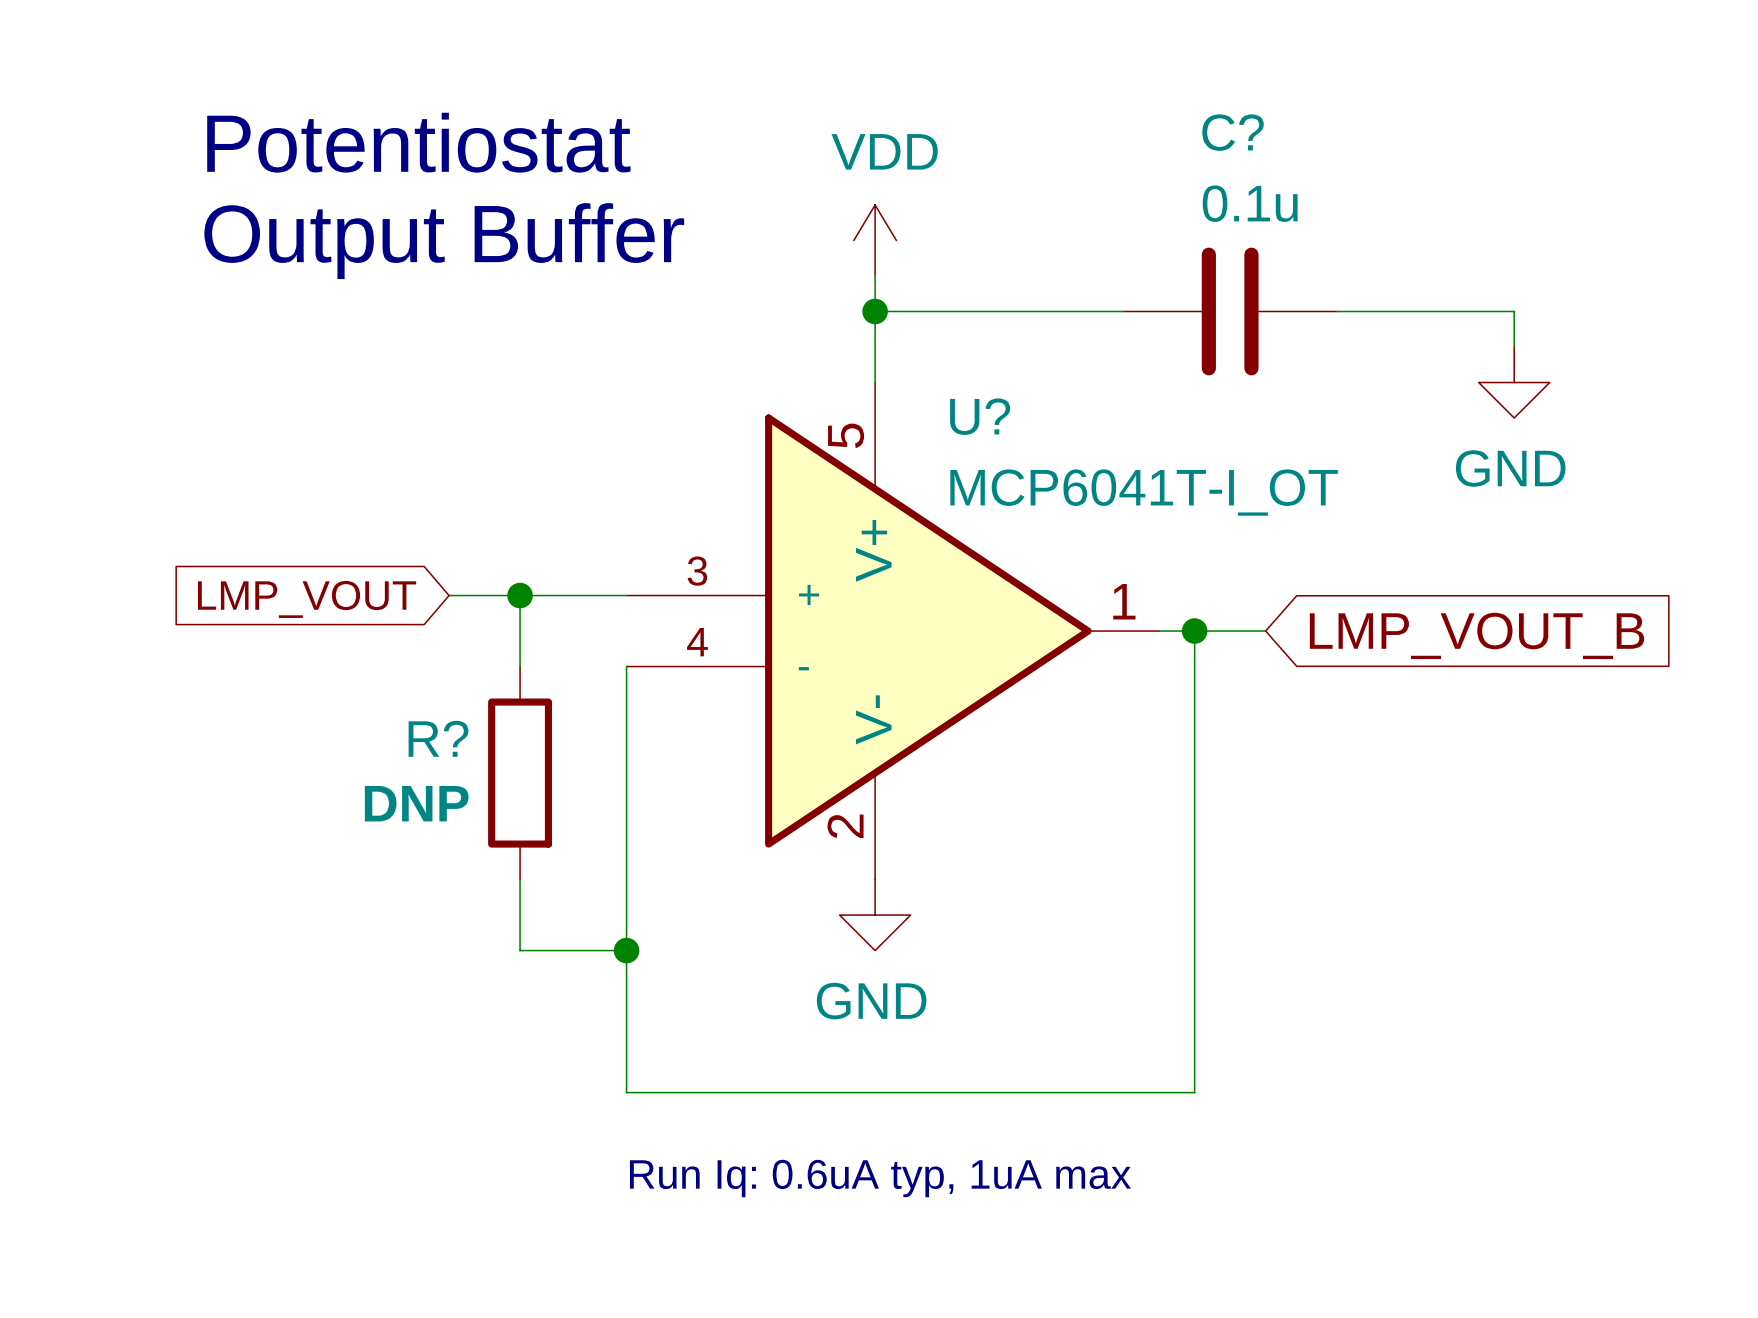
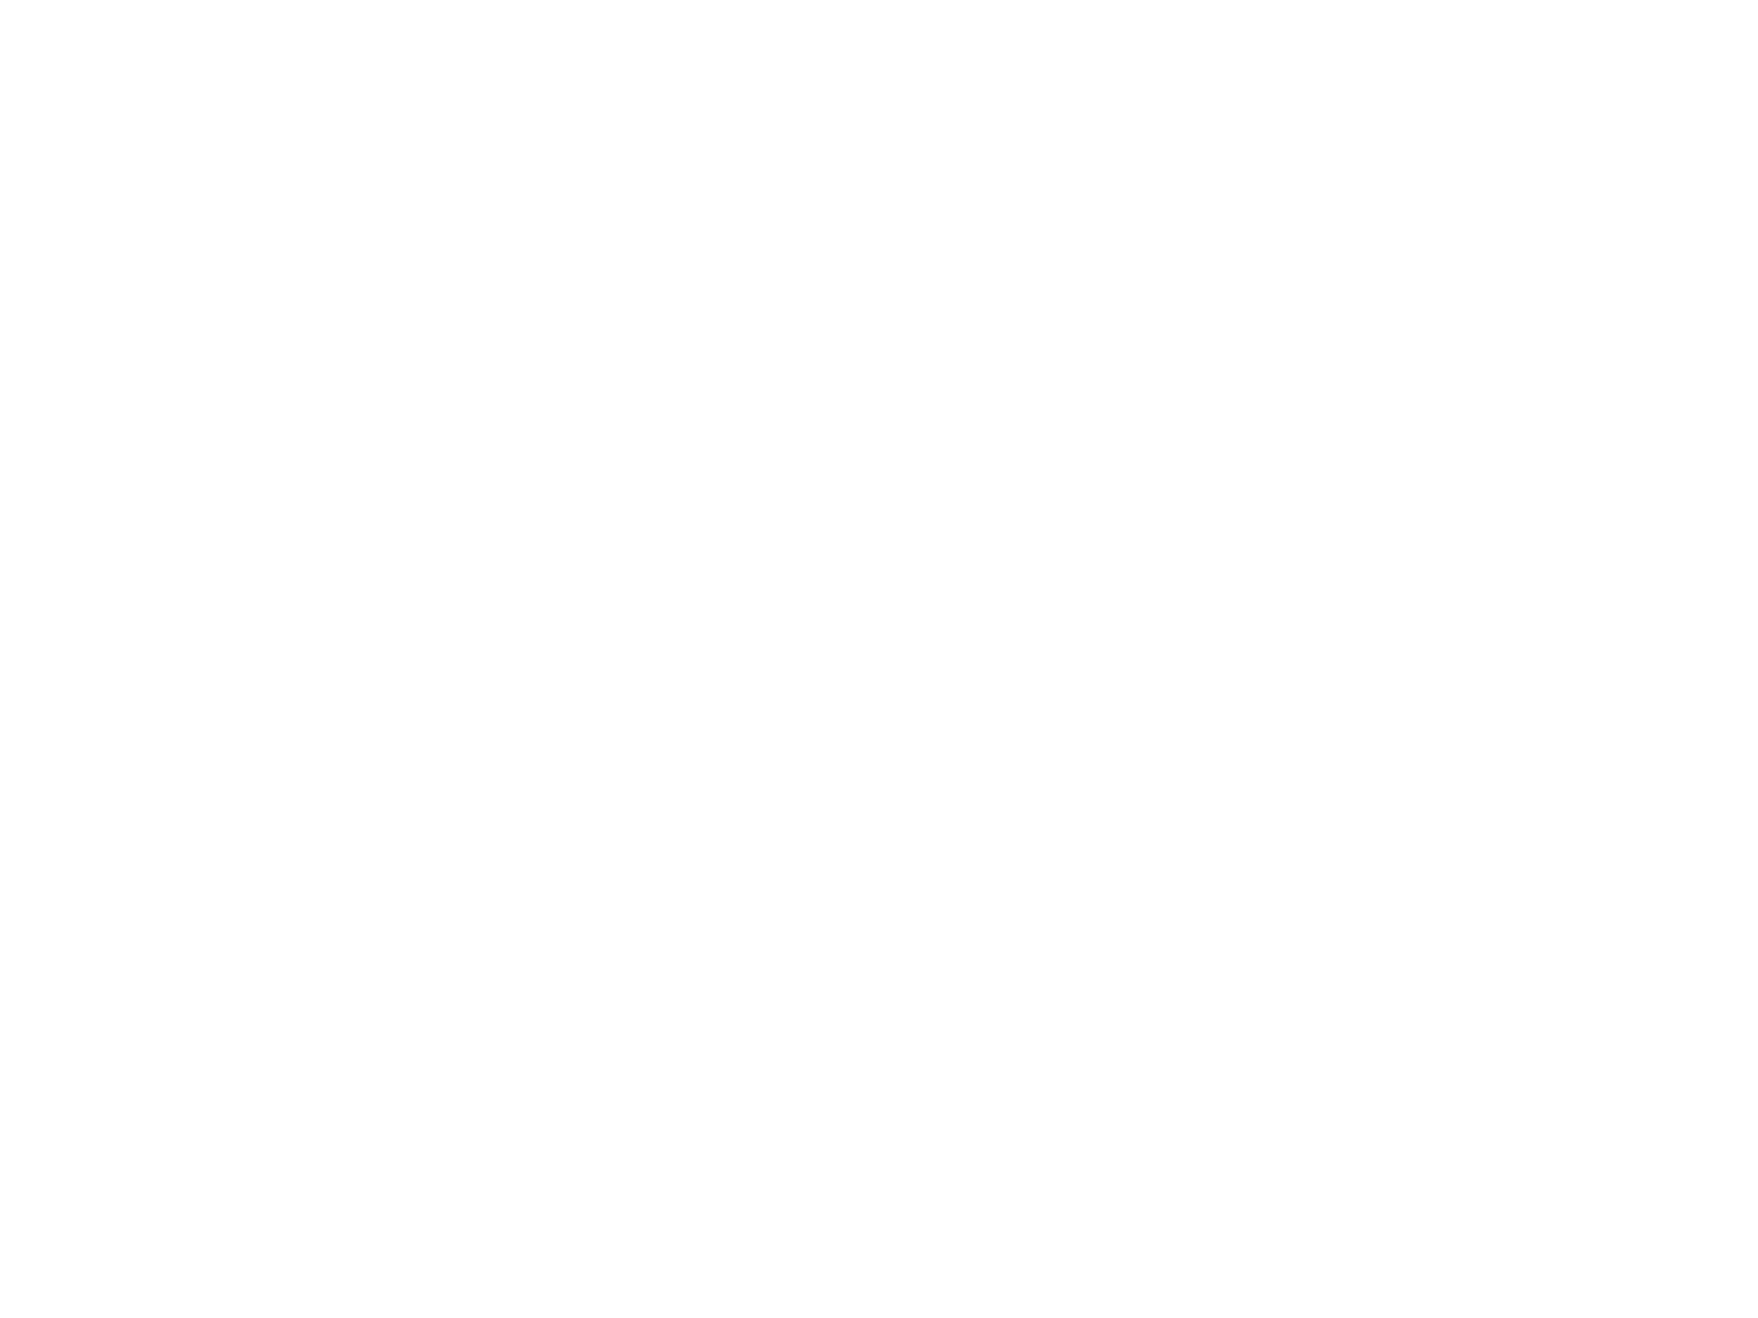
text: Potentiostat (418, 142) -> none
power symbol: VDD (875, 240) -> none
text: Output Buffer (444, 241) -> none
wire: (875, 275) (875, 382) -> none
wire: (875, 311) (1123, 311) -> none
junction: (875, 311) -> none
C?: 0.1u (1230, 311) -> none
wire: (1336, 311) (1514, 311) (1514, 347) -> none
power symbol: GND (1514, 382) -> none
wire: (449, 595) (626, 595) -> none
wire: (520, 595) (520, 666) -> none
junction: (520, 595) -> none
global label: LMP_VOUT (307, 599) -> none
U?: MCP6041T-I_OT (892, 631) -> none
wire: (1159, 631) (1265, 631) -> none
wire: (1194, 631) (1194, 1092) (626, 1092) (626, 666) -> none
junction: (1194, 631) -> none
global label: LMP_VOUT_B (1477, 635) -> none
R?: DNP (520, 773) -> none
wire: (520, 879) (520, 950) (626, 950) -> none
power symbol: GND (875, 915) -> none
junction: (626, 950) -> none
text: Run Iq: 0.6uA typ, 1uA max (880, 1178) -> none

